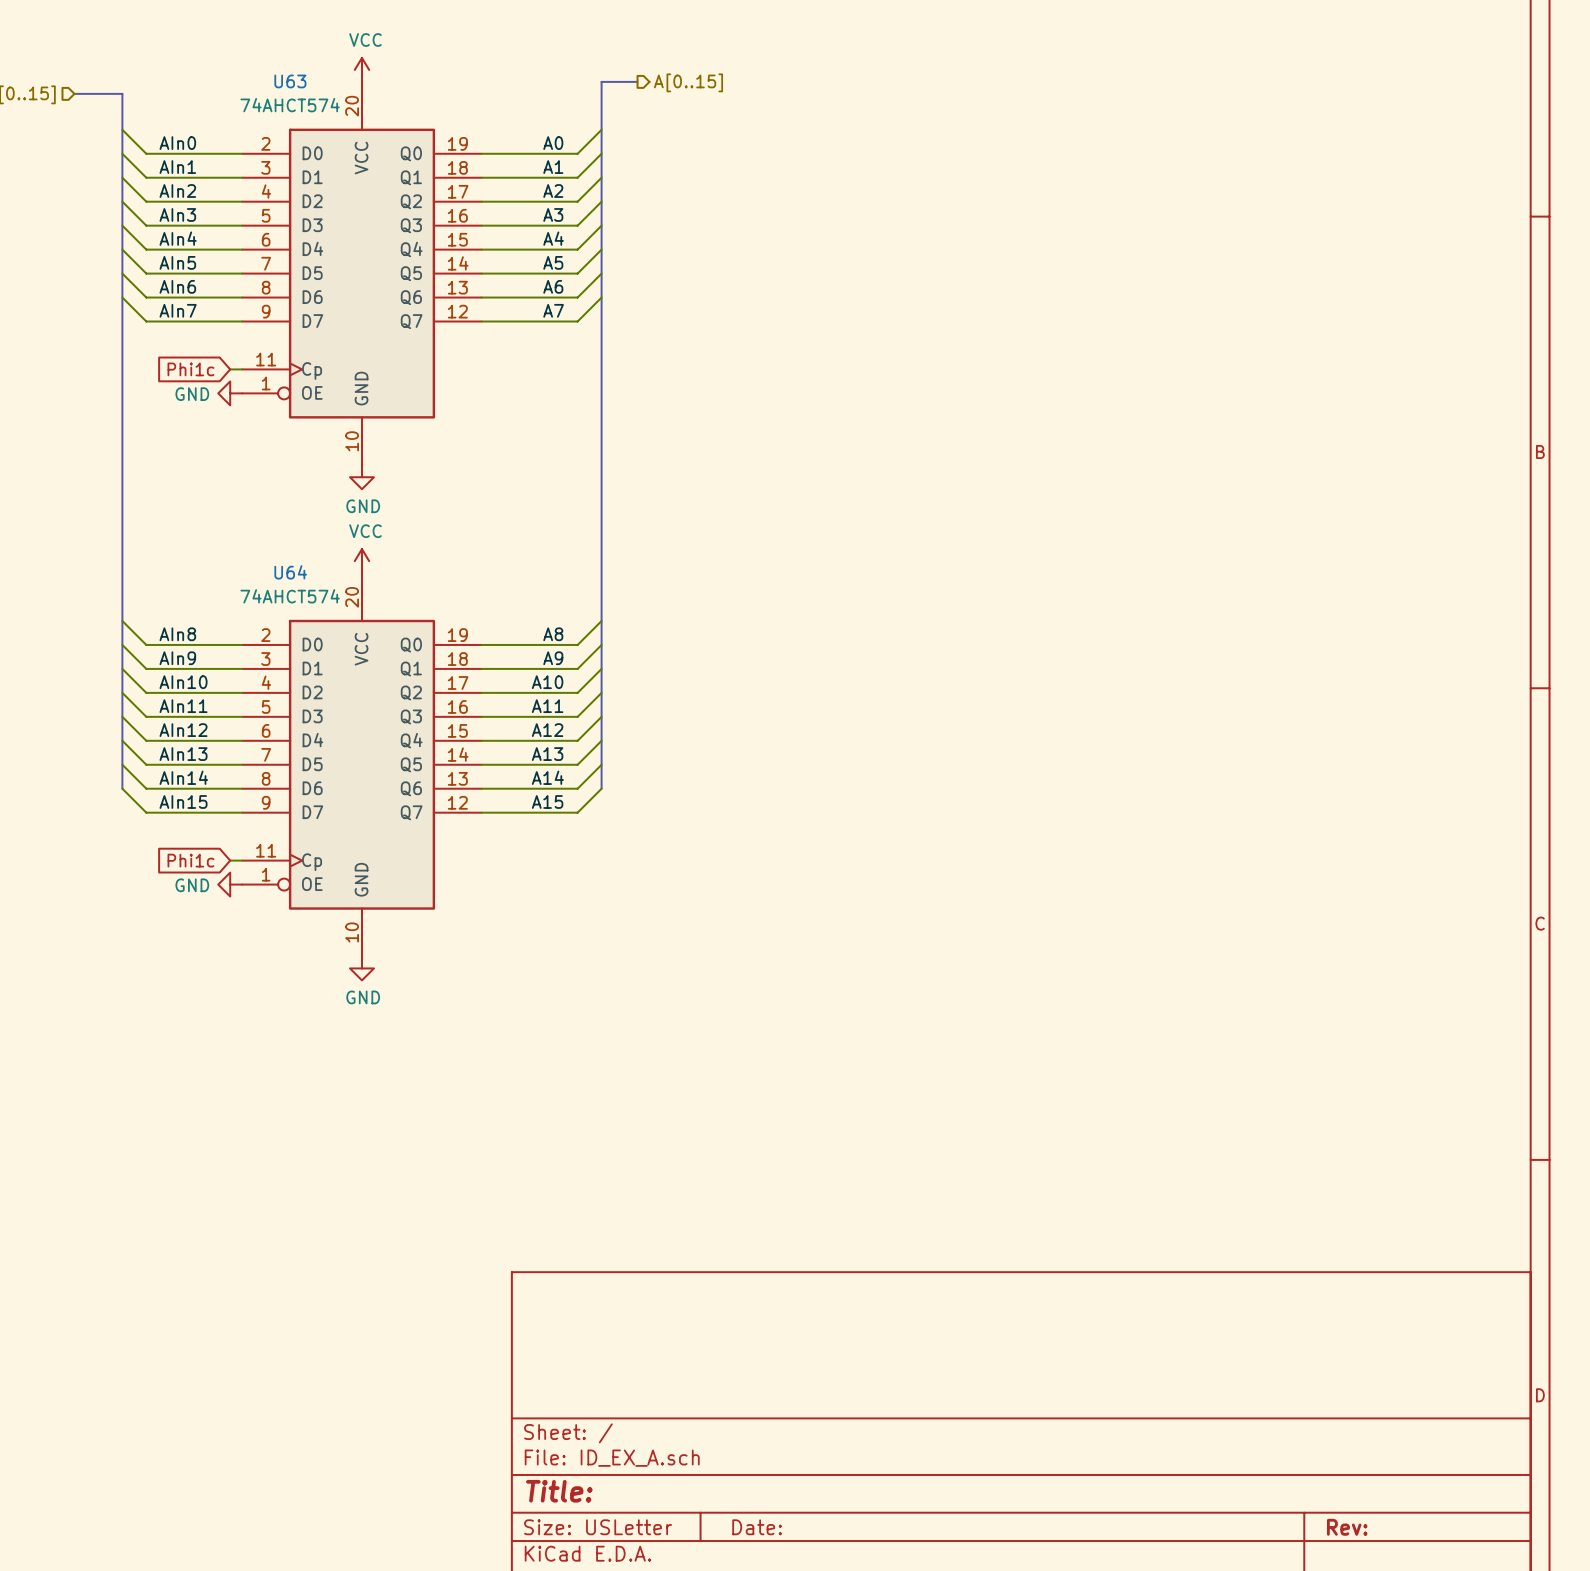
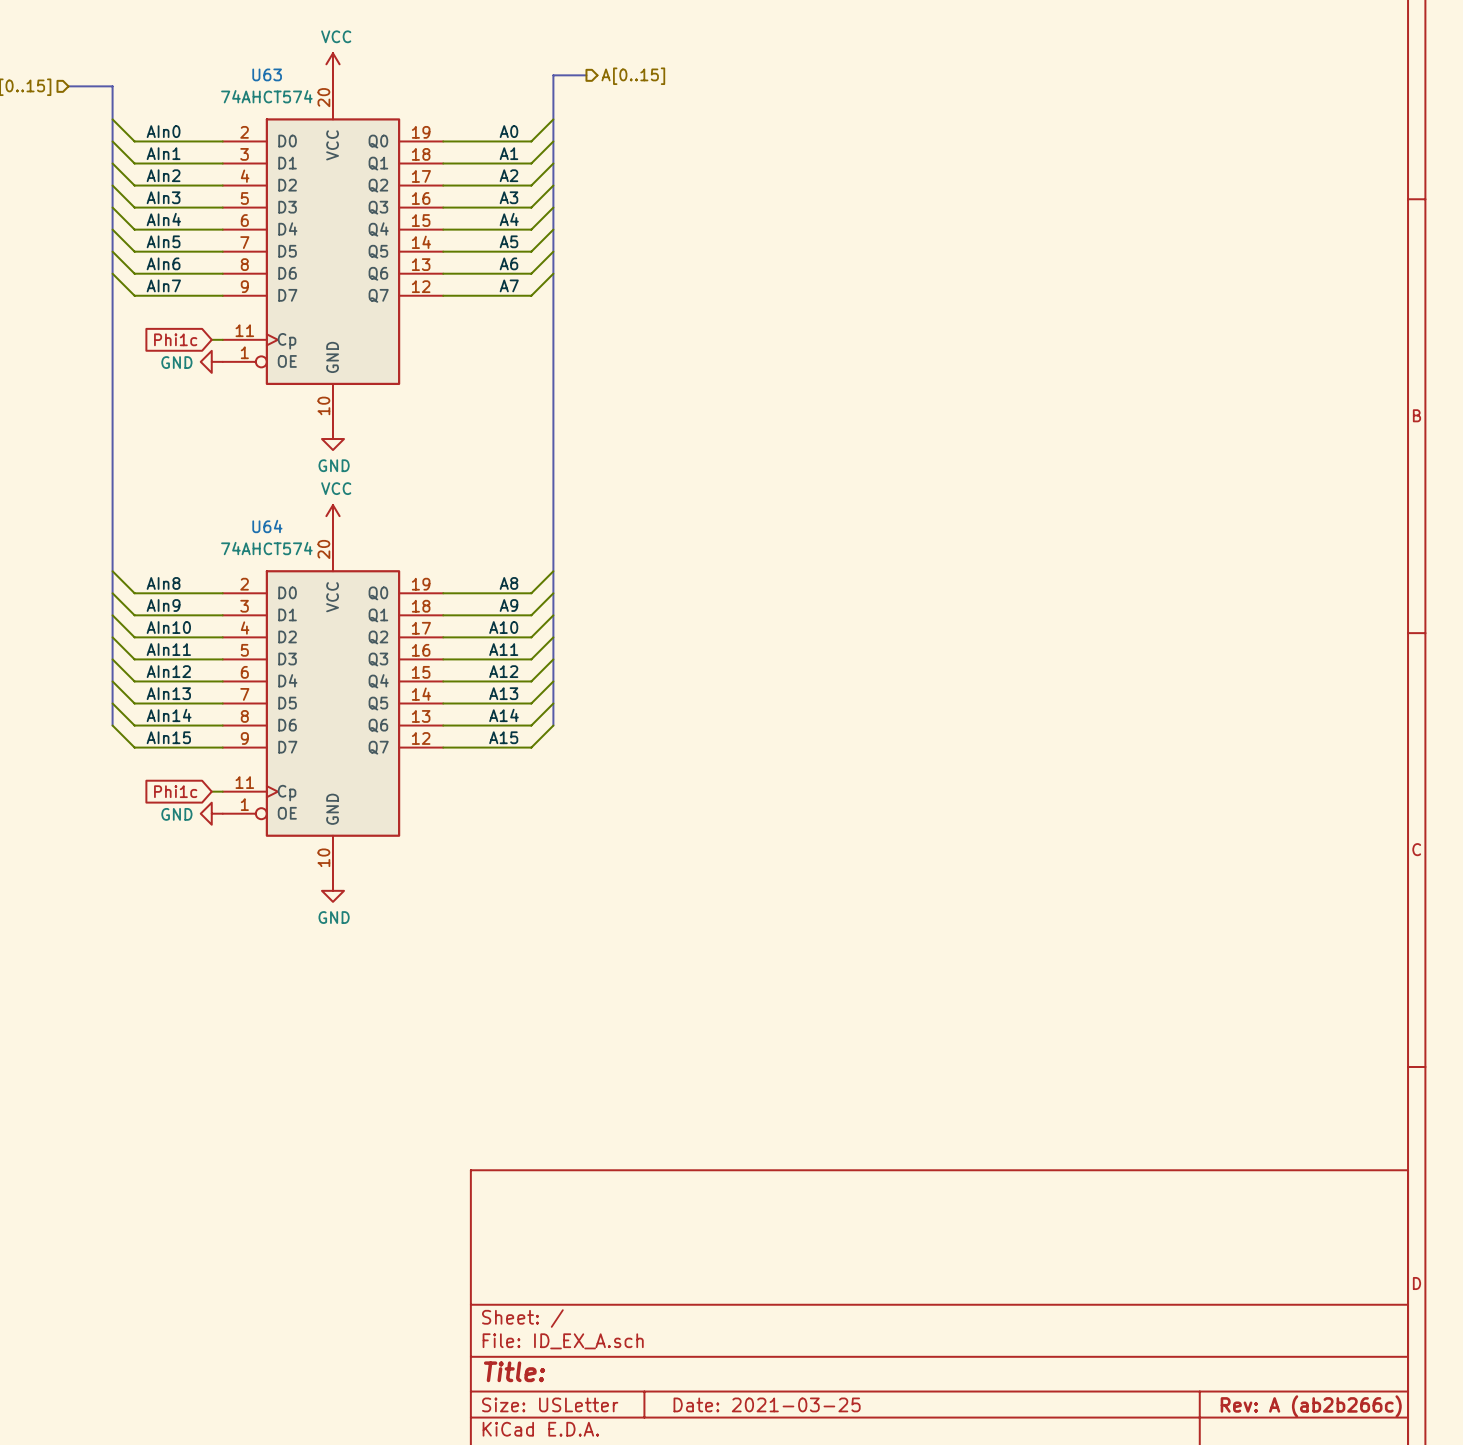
title block: Date: (757, 1527) -> Date: 2021-03-25 (767, 1404)
title block: Rev: (1347, 1527) -> Rev: A (ab2b266c) (1311, 1406)

